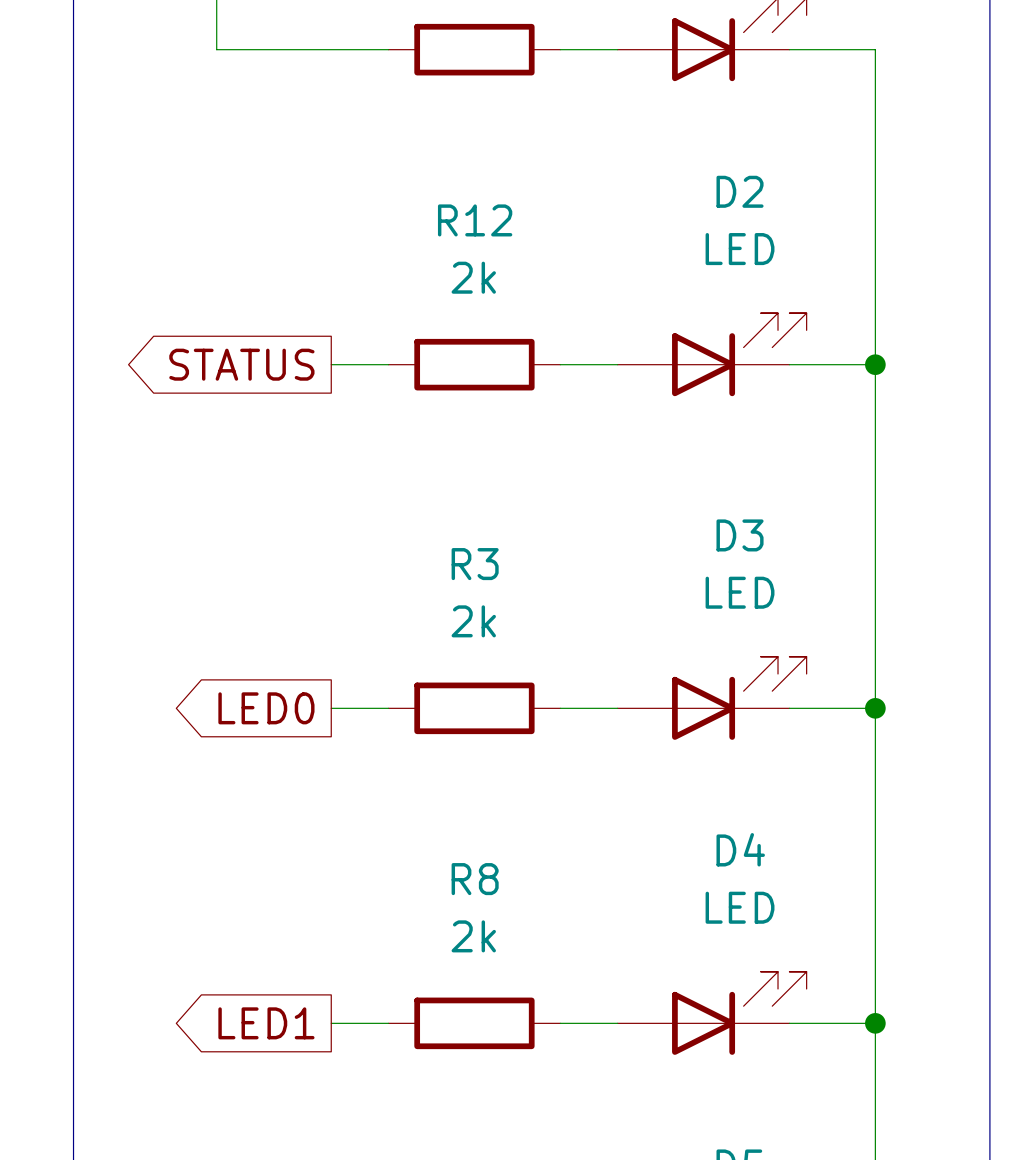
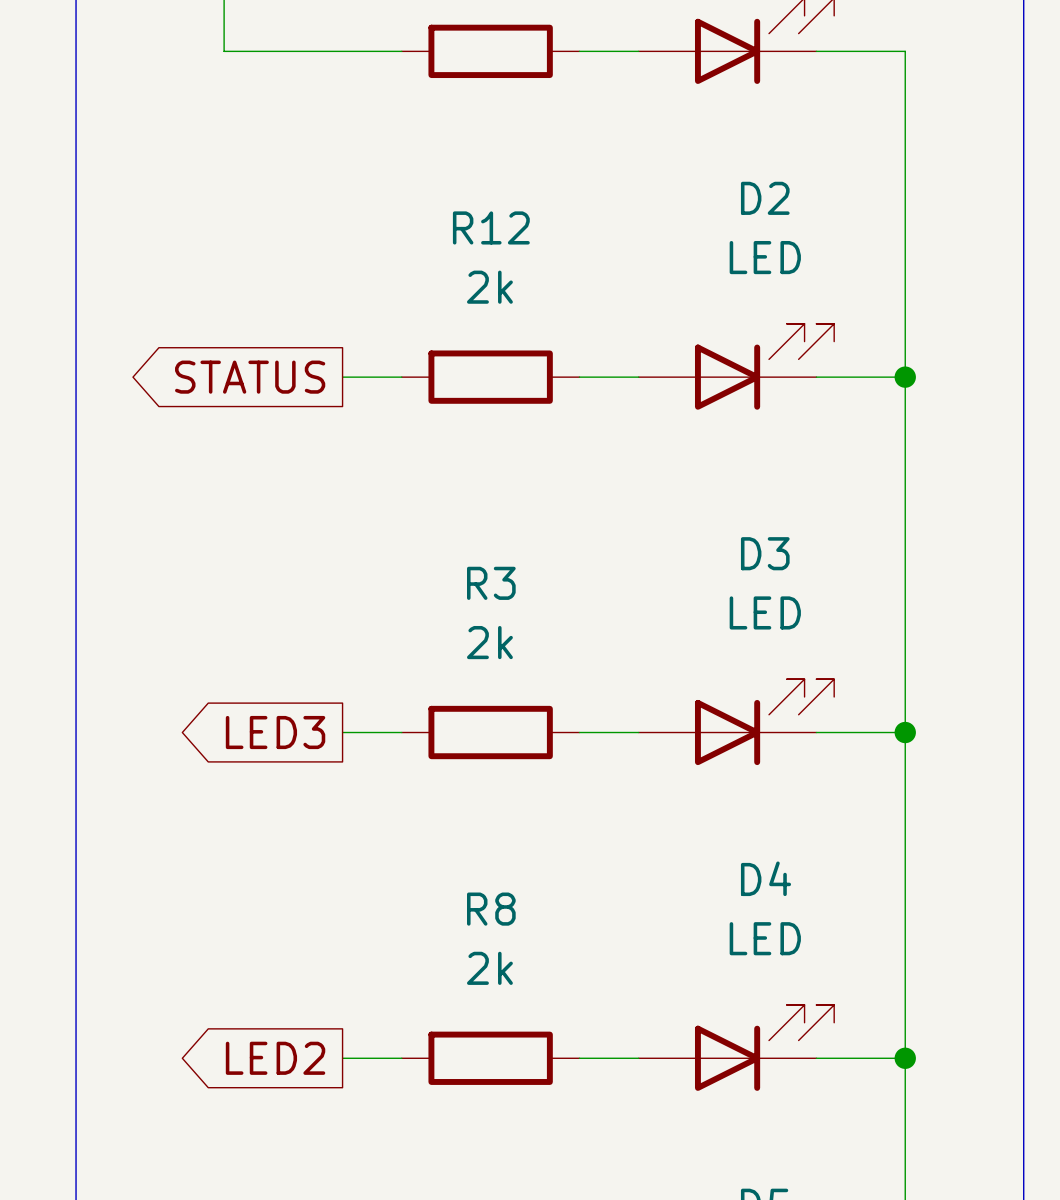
global label: LED0 (266, 708) -> LED3 (275, 732)
global label: LED1 (266, 1023) -> LED2 (275, 1058)

